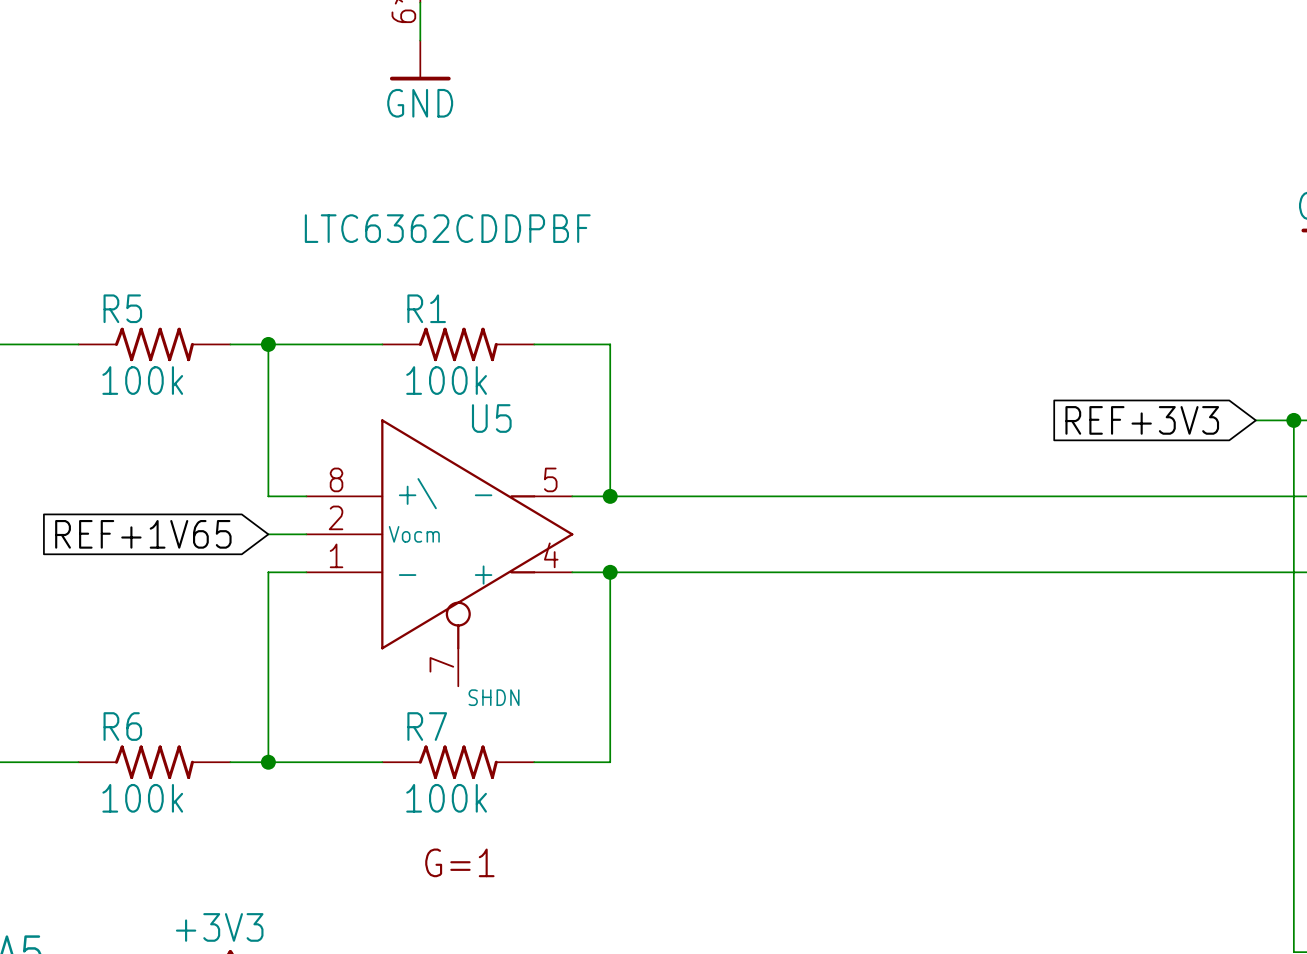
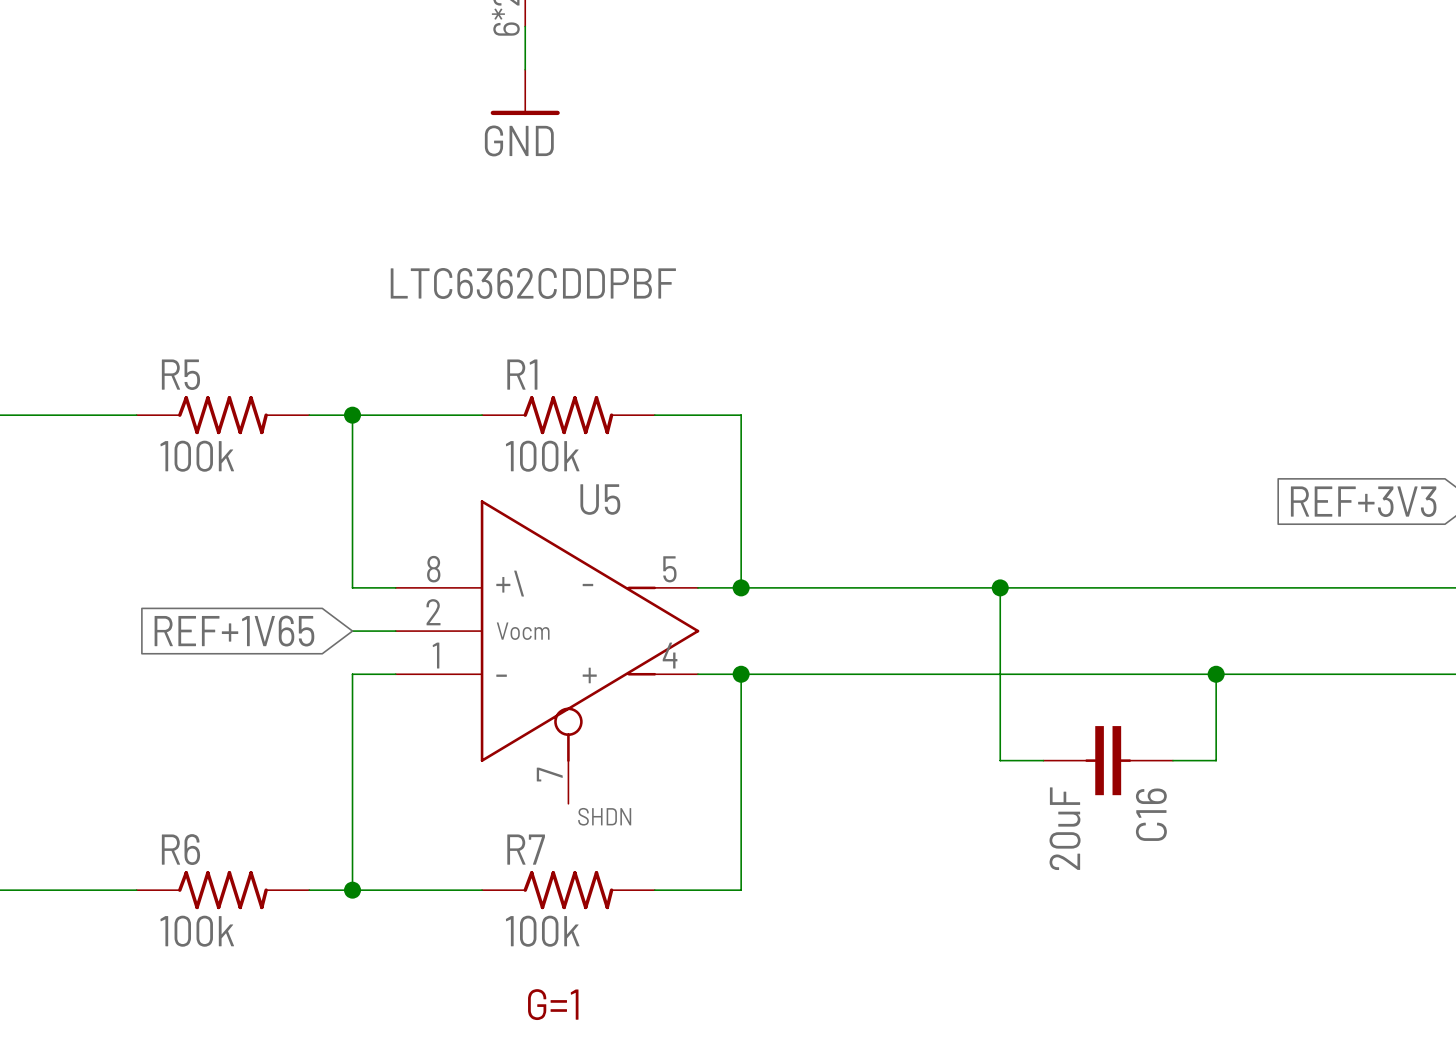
wire: none -> (1000, 587) (1000, 760) (1043, 760)
junction: none -> (1000, 587)
wire: none -> (1216, 674) (1216, 760) (1172, 760)
junction: none -> (1216, 674)
C16: none -> 20uF (1108, 760)

